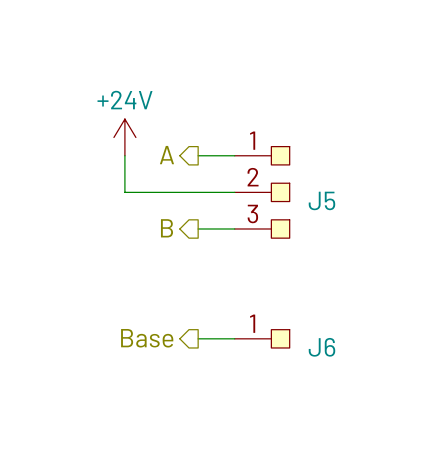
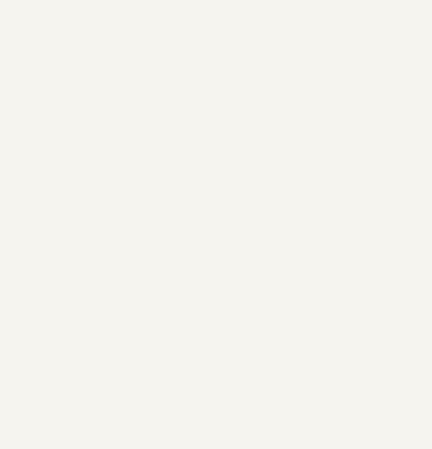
power symbol: +24V (124, 137) -> none
wire: (124, 155) (124, 192) (234, 192) -> none
hierarchical label: A (166, 155) -> none
wire: (198, 155) (234, 155) -> none
J5: (262, 192) -> none
hierarchical label: B (166, 228) -> none
wire: (198, 228) (234, 228) -> none
hierarchical label: Base (147, 338) -> none
wire: (198, 338) (234, 338) -> none
J6: (262, 338) -> none

